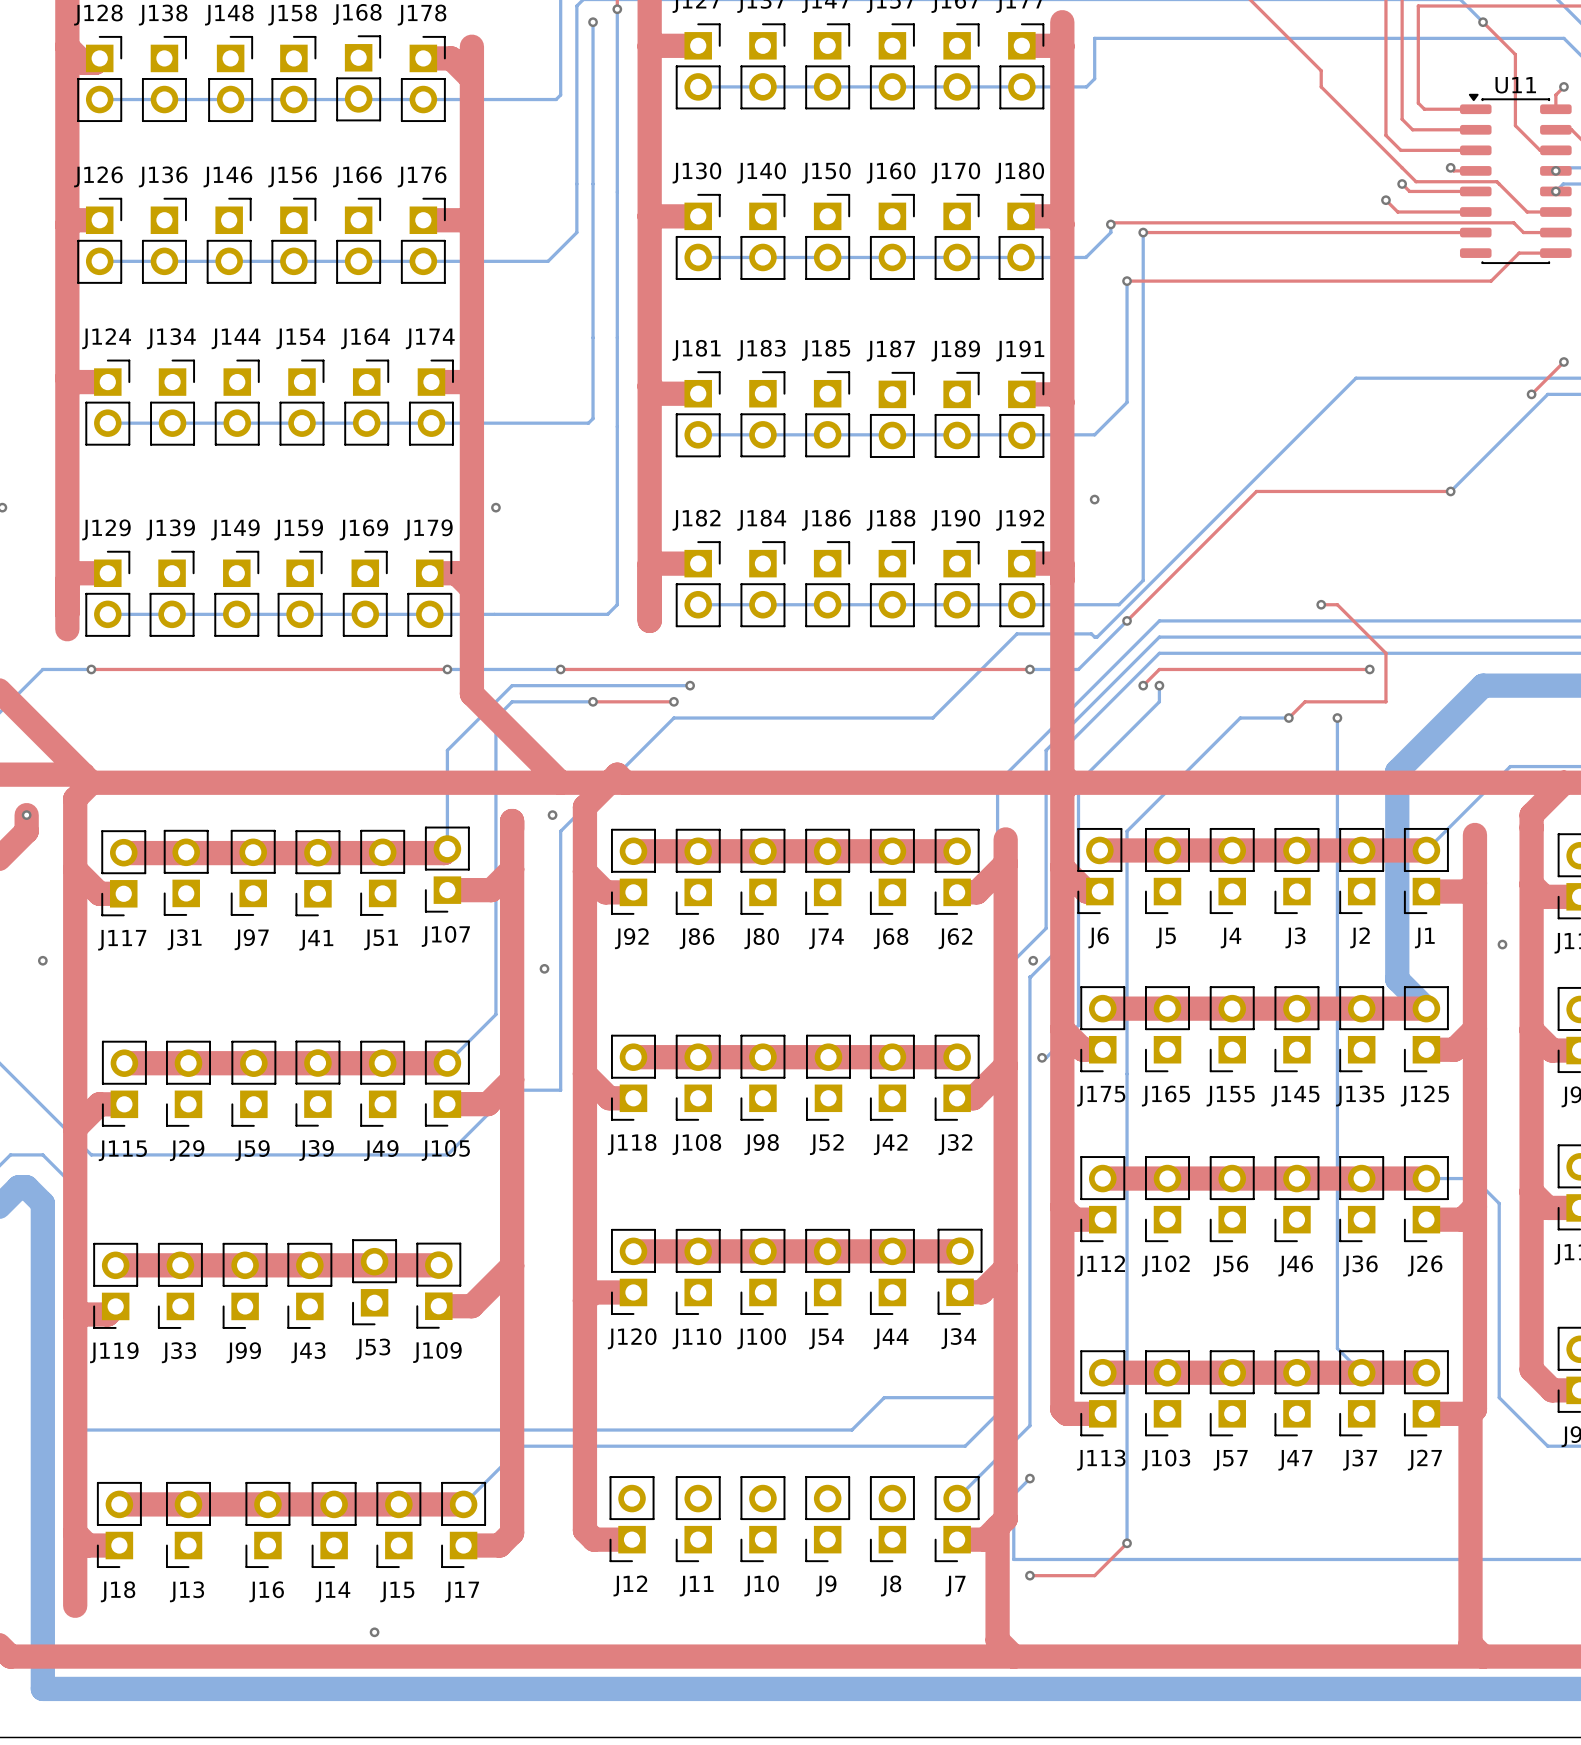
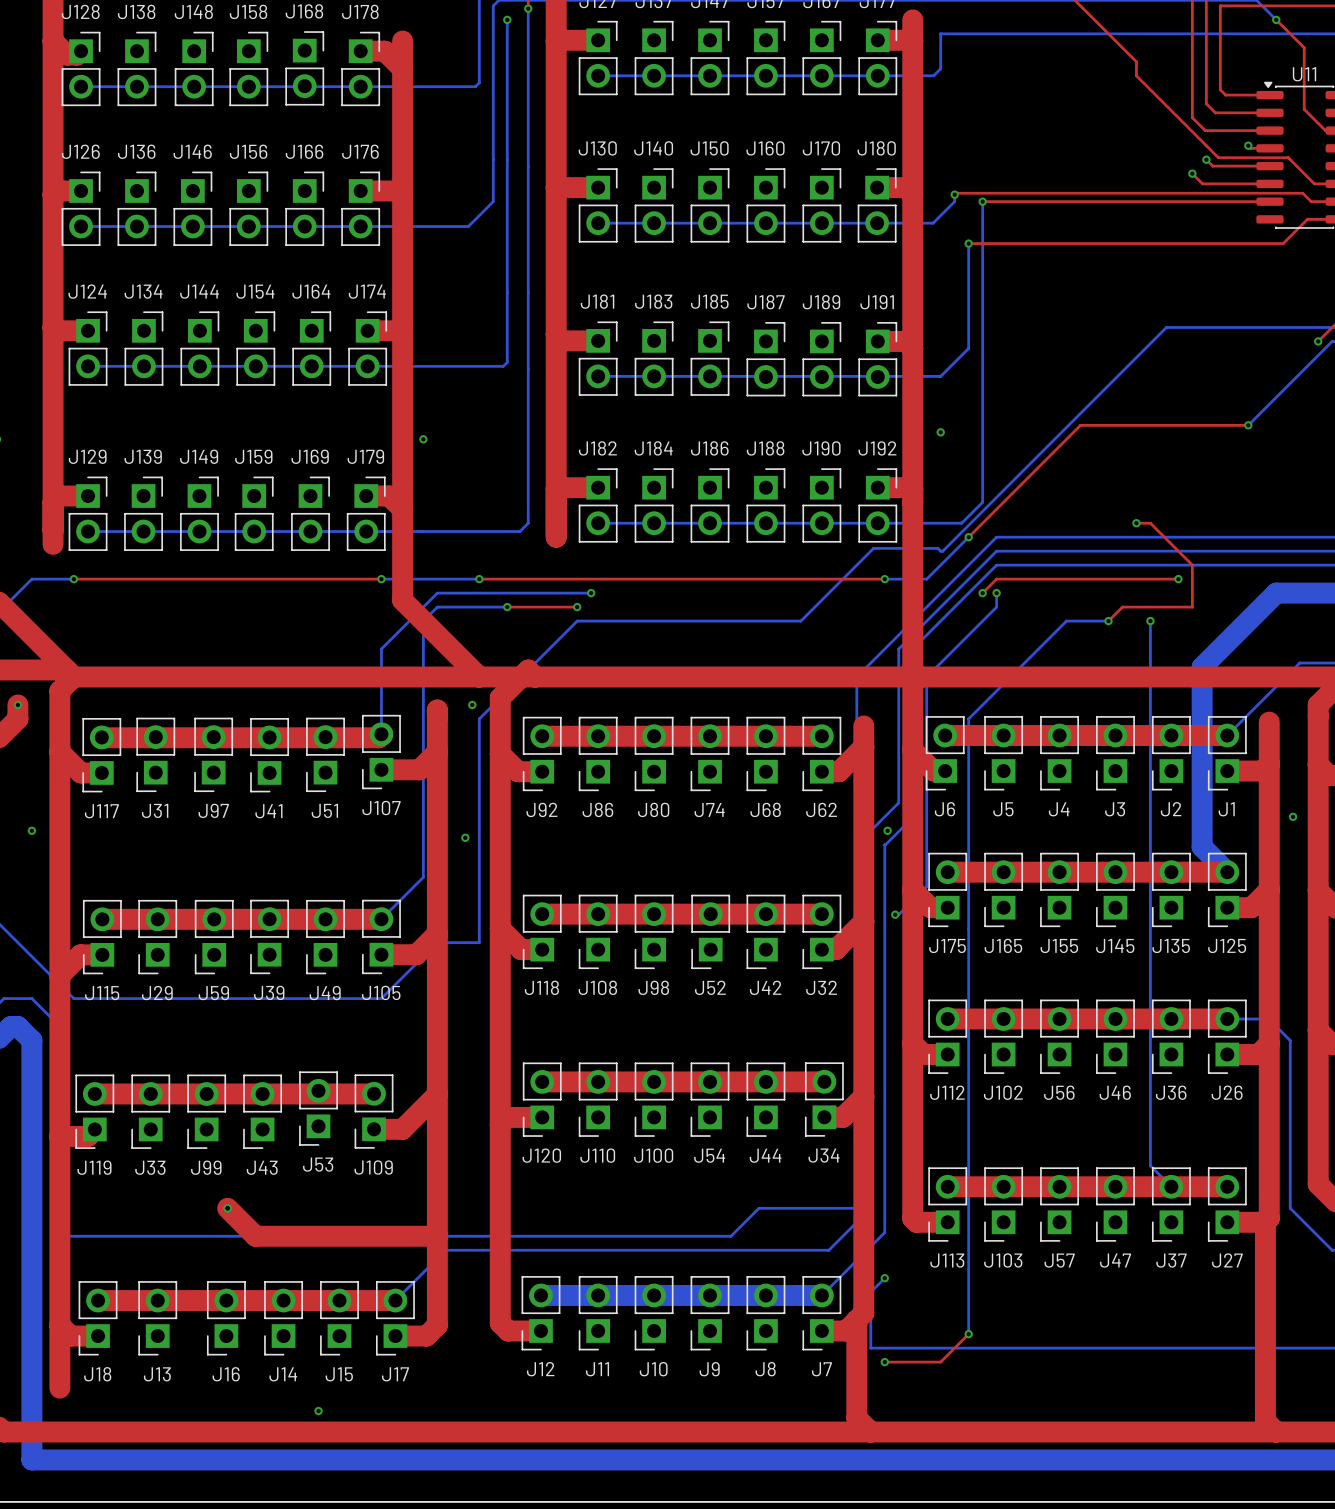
top track: none -> (227, 1208) (255, 1236) (437, 1236)
via: none -> (227, 1208)
bottom track: none -> (540, 1295) (821, 1295)

